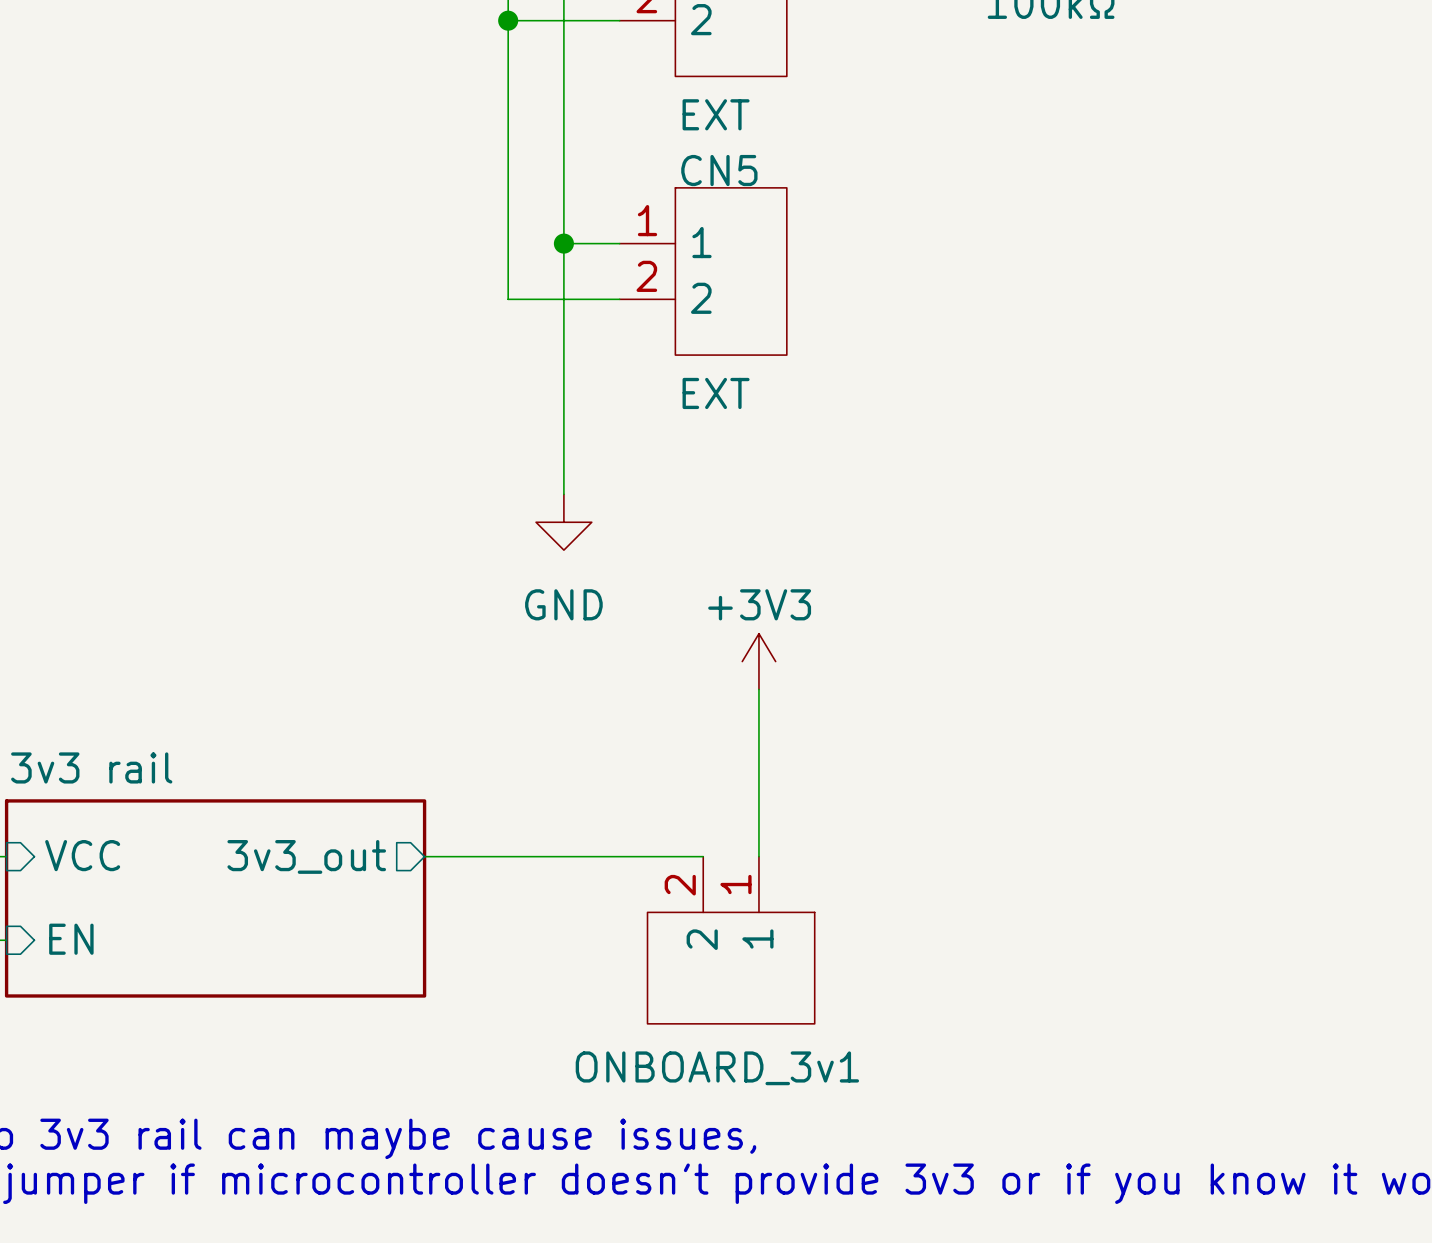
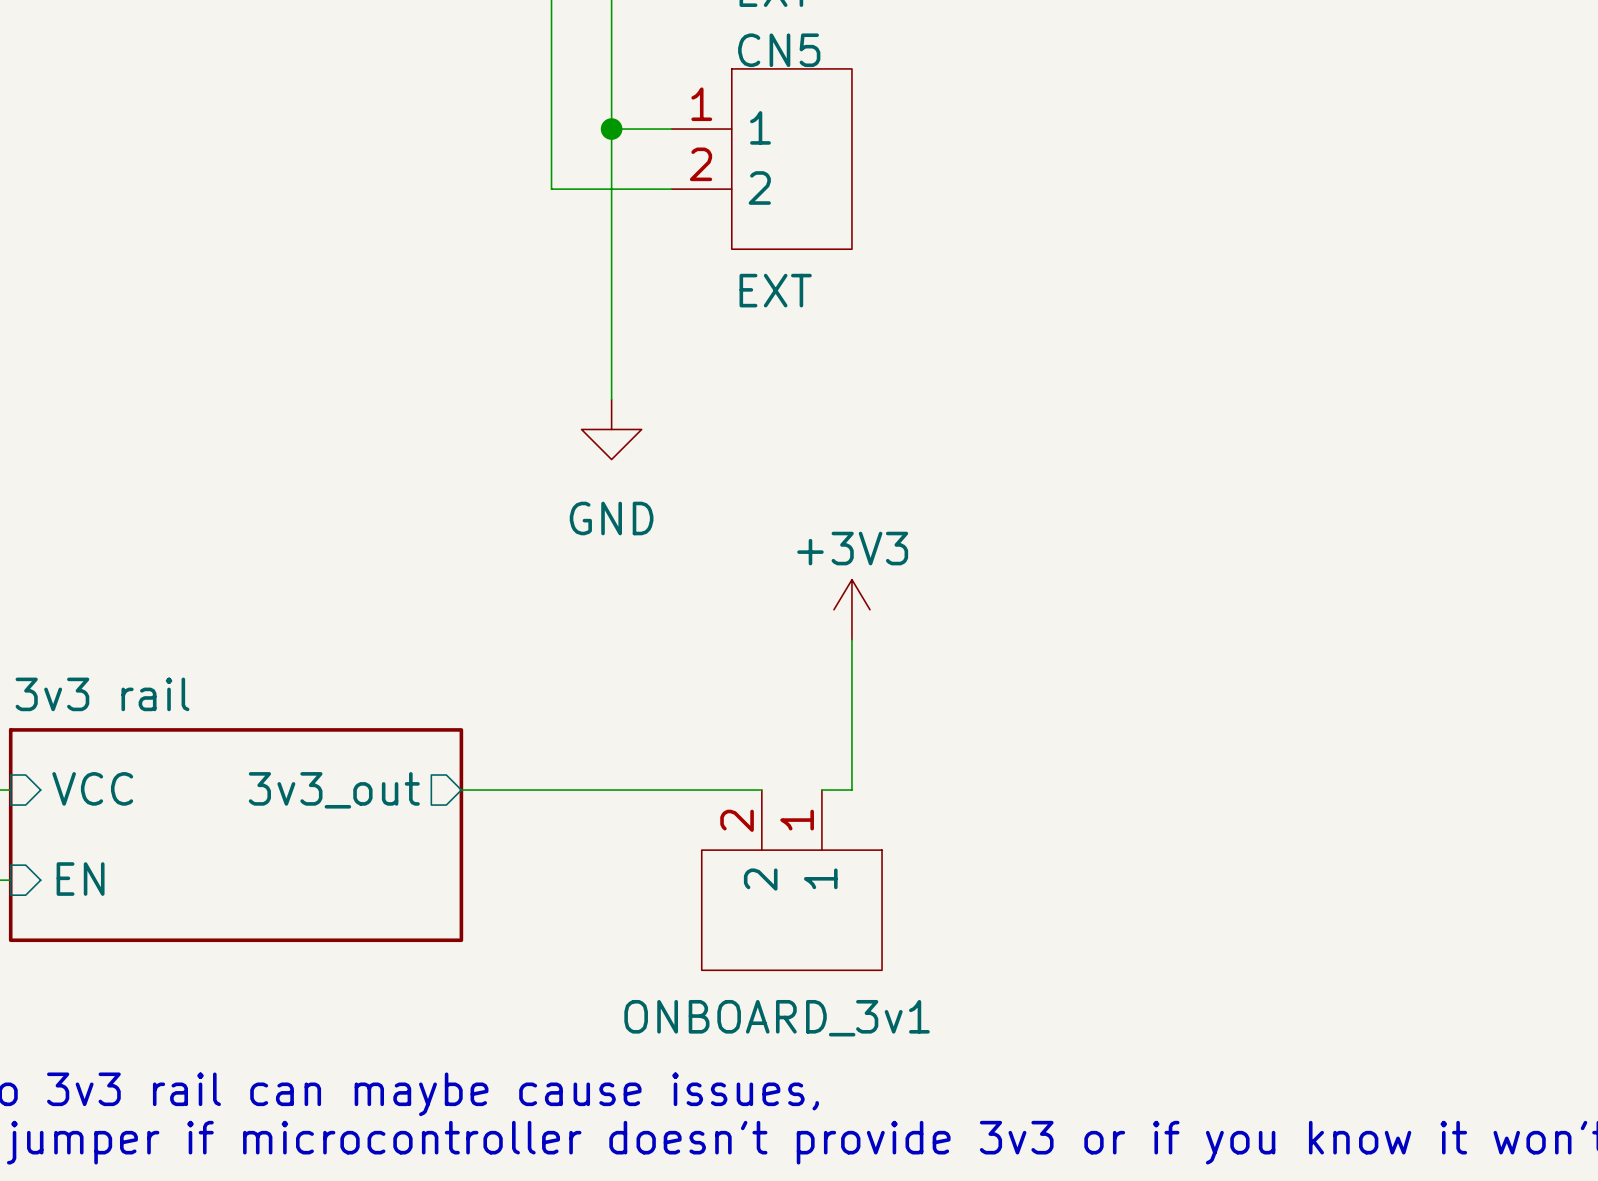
power symbol position: +3V3 (758, 661) -> +3V3 (851, 609)
wire: (758, 689) (758, 856) -> (851, 639) (851, 790) (821, 790)

